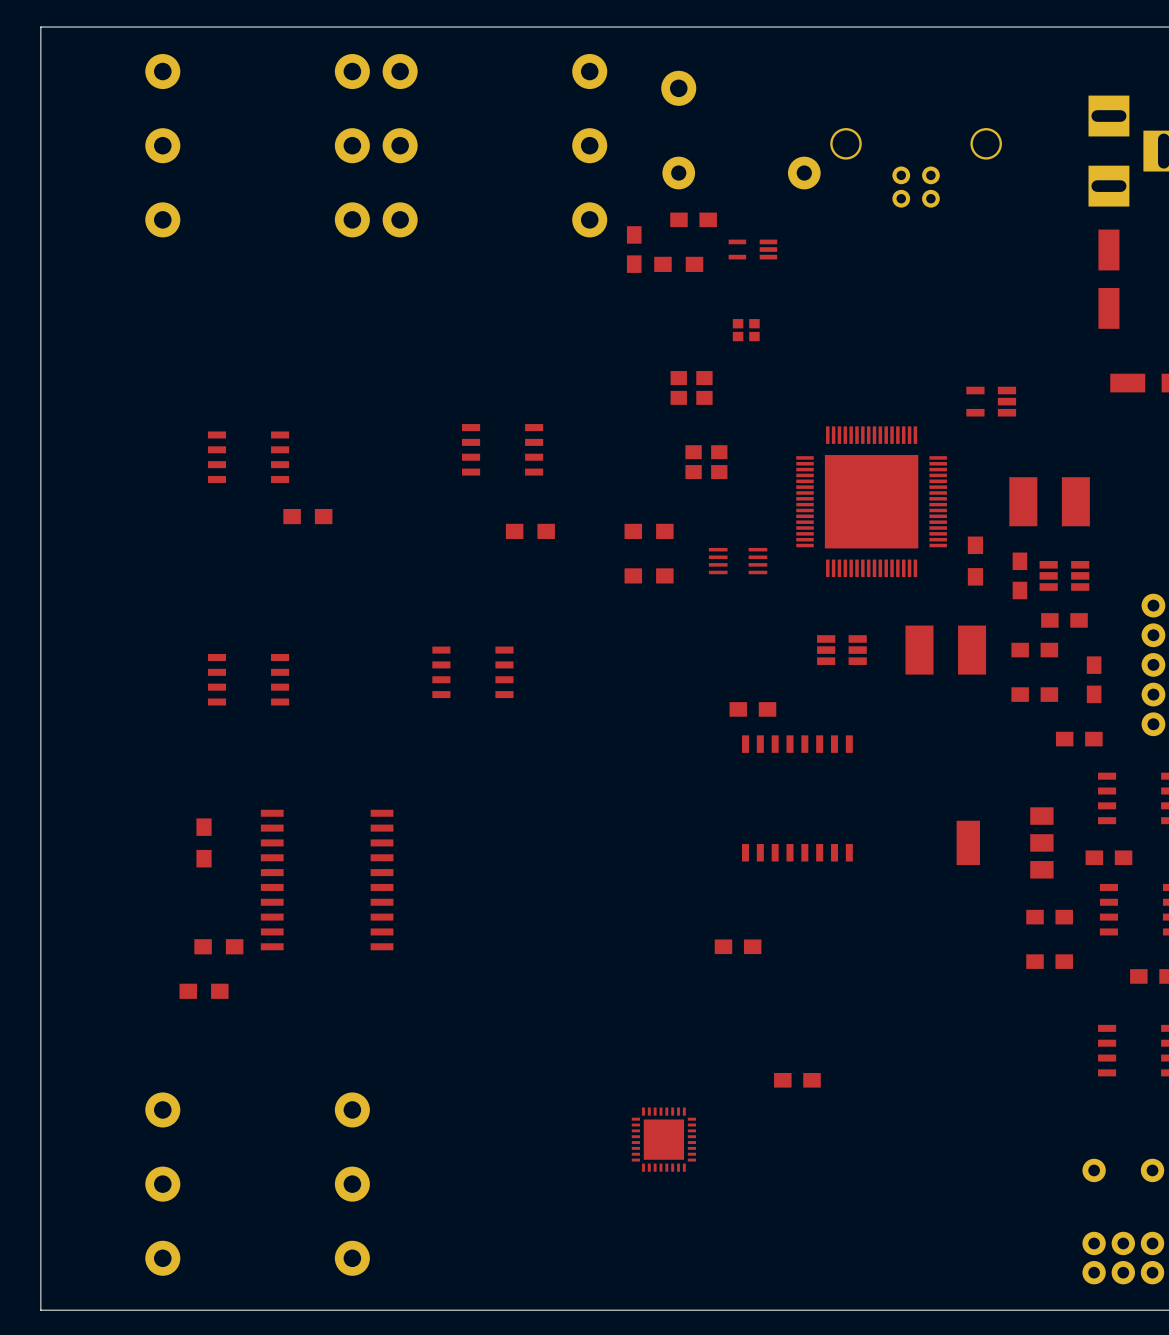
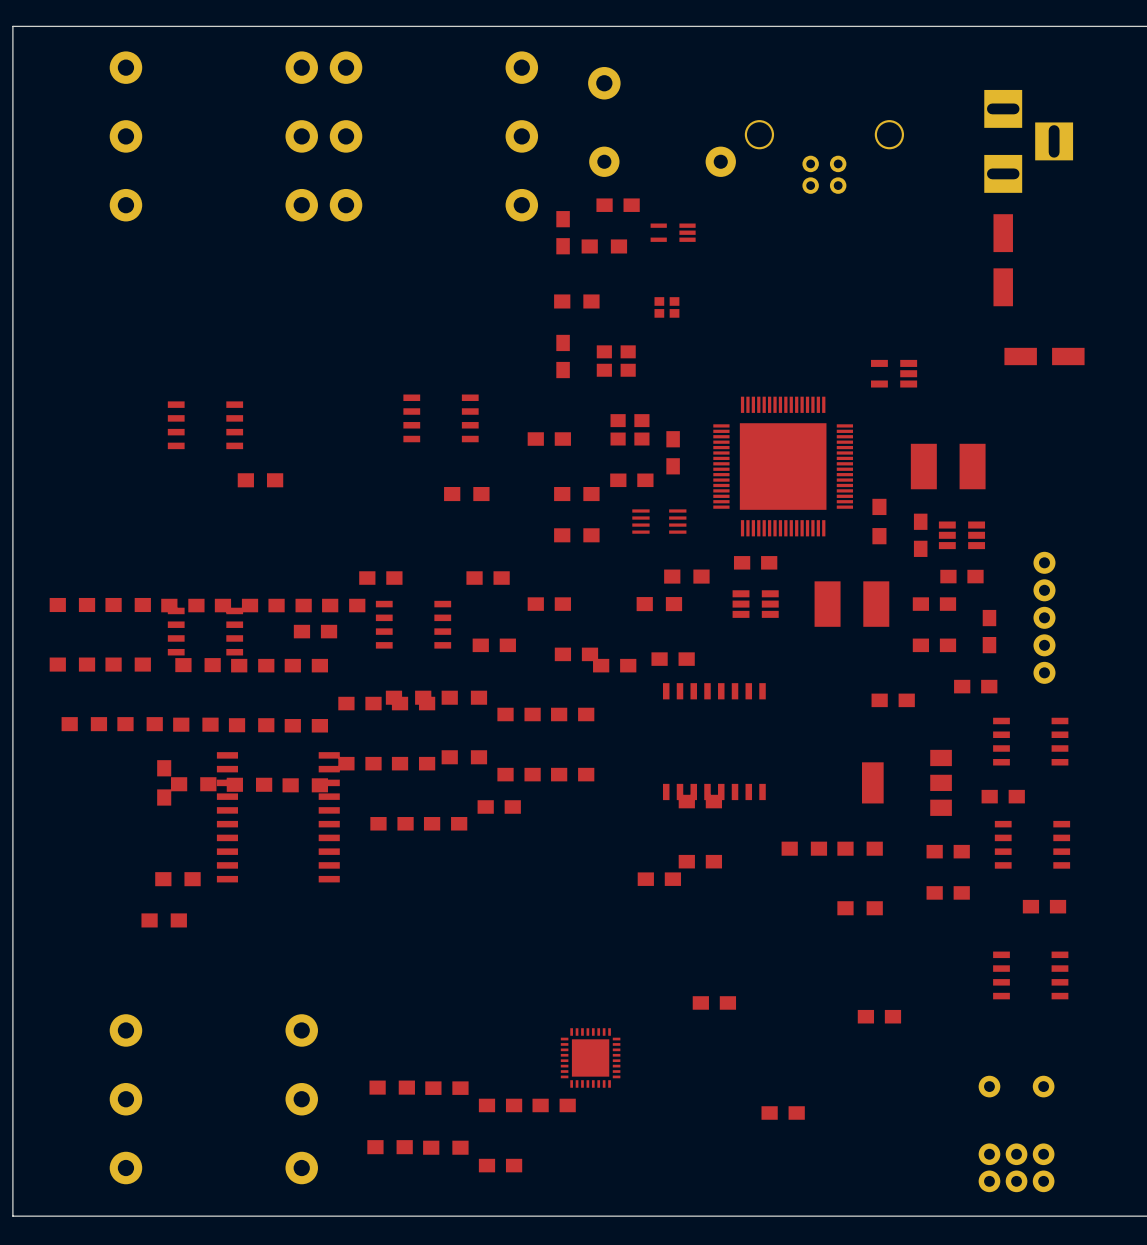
part: none -> (576, 301)
part: none -> (563, 356)
part: none -> (549, 439)
part: none -> (673, 452)
part: none -> (631, 480)
part: none -> (755, 562)
part: none -> (686, 576)
part: none -> (380, 578)
part: none -> (488, 578)
part: none -> (549, 604)
part: none -> (659, 604)
part: none -> (72, 605)
part: none -> (128, 605)
part: none -> (182, 605)
part: none -> (236, 605)
part: none -> (290, 605)
part: none -> (343, 605)
part: none -> (315, 631)
part: none -> (494, 645)
part: none -> (576, 654)
part: none -> (72, 664)
part: none -> (128, 664)
part: none -> (198, 665)
part: none -> (252, 665)
part: none -> (306, 665)
part: none -> (614, 665)
part: none -> (408, 697)
part: none -> (464, 697)
part: none -> (893, 700)
part: none -> (359, 703)
part: none -> (413, 703)
part: none -> (519, 714)
part: none -> (572, 714)
part: none -> (84, 724)
part: none -> (140, 724)
part: none -> (195, 724)
part: none -> (251, 725)
part: none -> (306, 725)
part: none -> (464, 757)
part: none -> (359, 763)
part: none -> (413, 763)
part: none -> (519, 774)
part: none -> (572, 774)
part: none -> (193, 784)
part: none -> (249, 784)
part: none -> (305, 785)
part: none -> (700, 801)
part: none -> (499, 806)
part: none -> (392, 823)
part: none -> (445, 823)
part: none -> (804, 848)
part: none -> (860, 848)
part: none -> (700, 861)
part: none -> (860, 908)
part: none -> (879, 1016)
part: none -> (392, 1087)
part: none -> (446, 1088)
part: none -> (500, 1105)
part: none -> (554, 1105)
part: none -> (783, 1112)
part: none -> (390, 1147)
part: none -> (445, 1147)
part: none -> (500, 1165)

